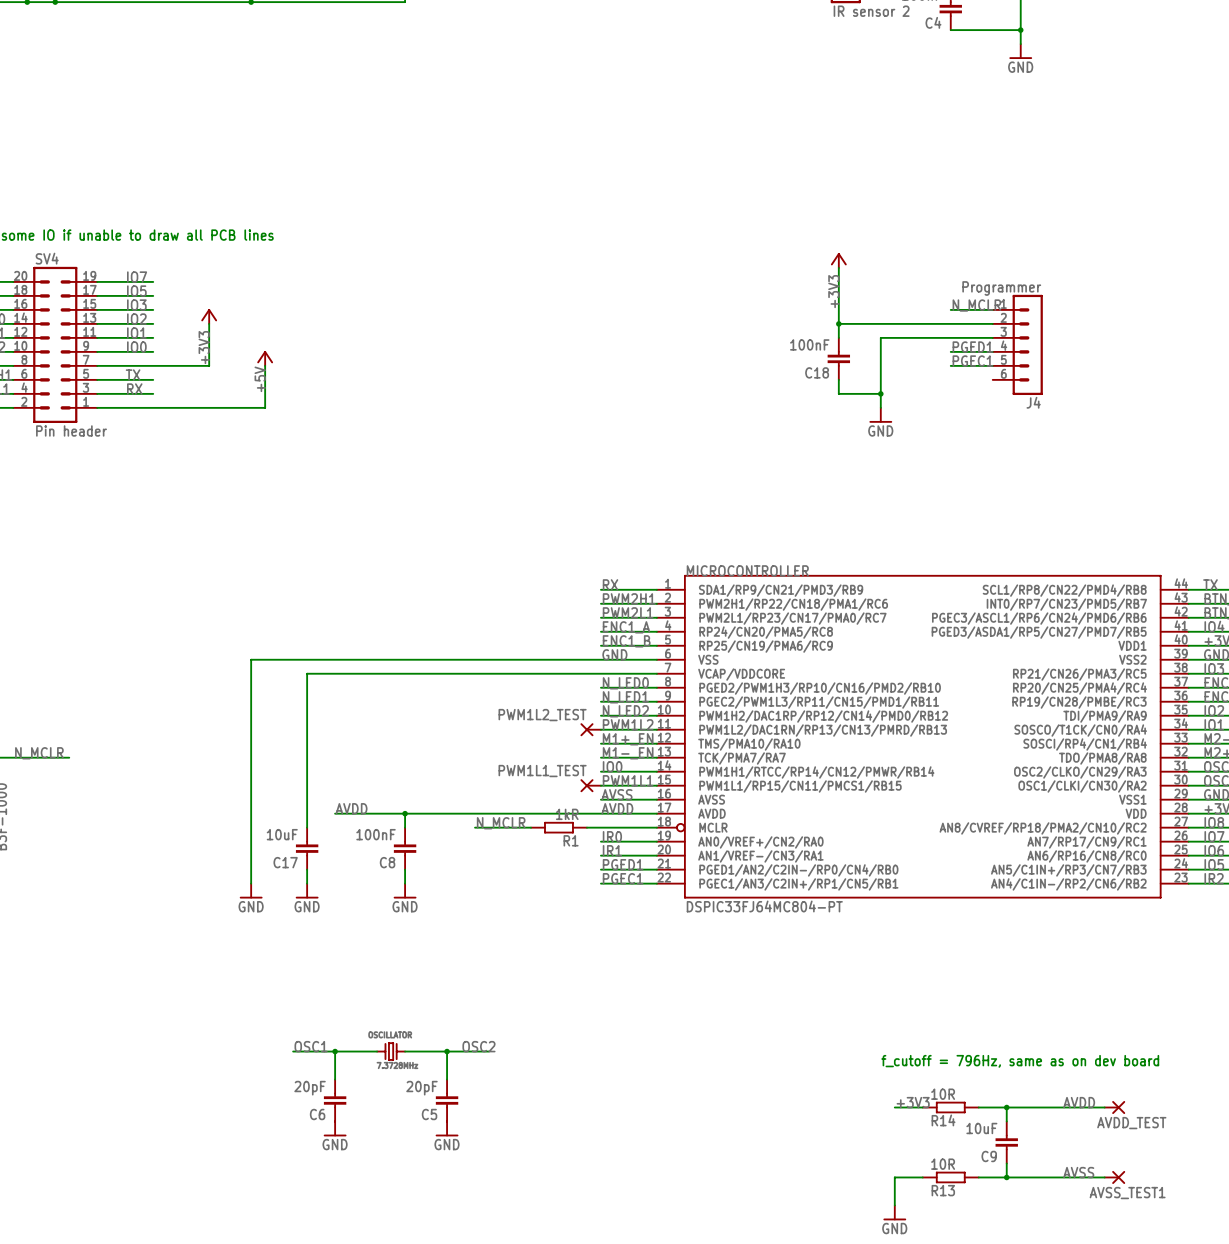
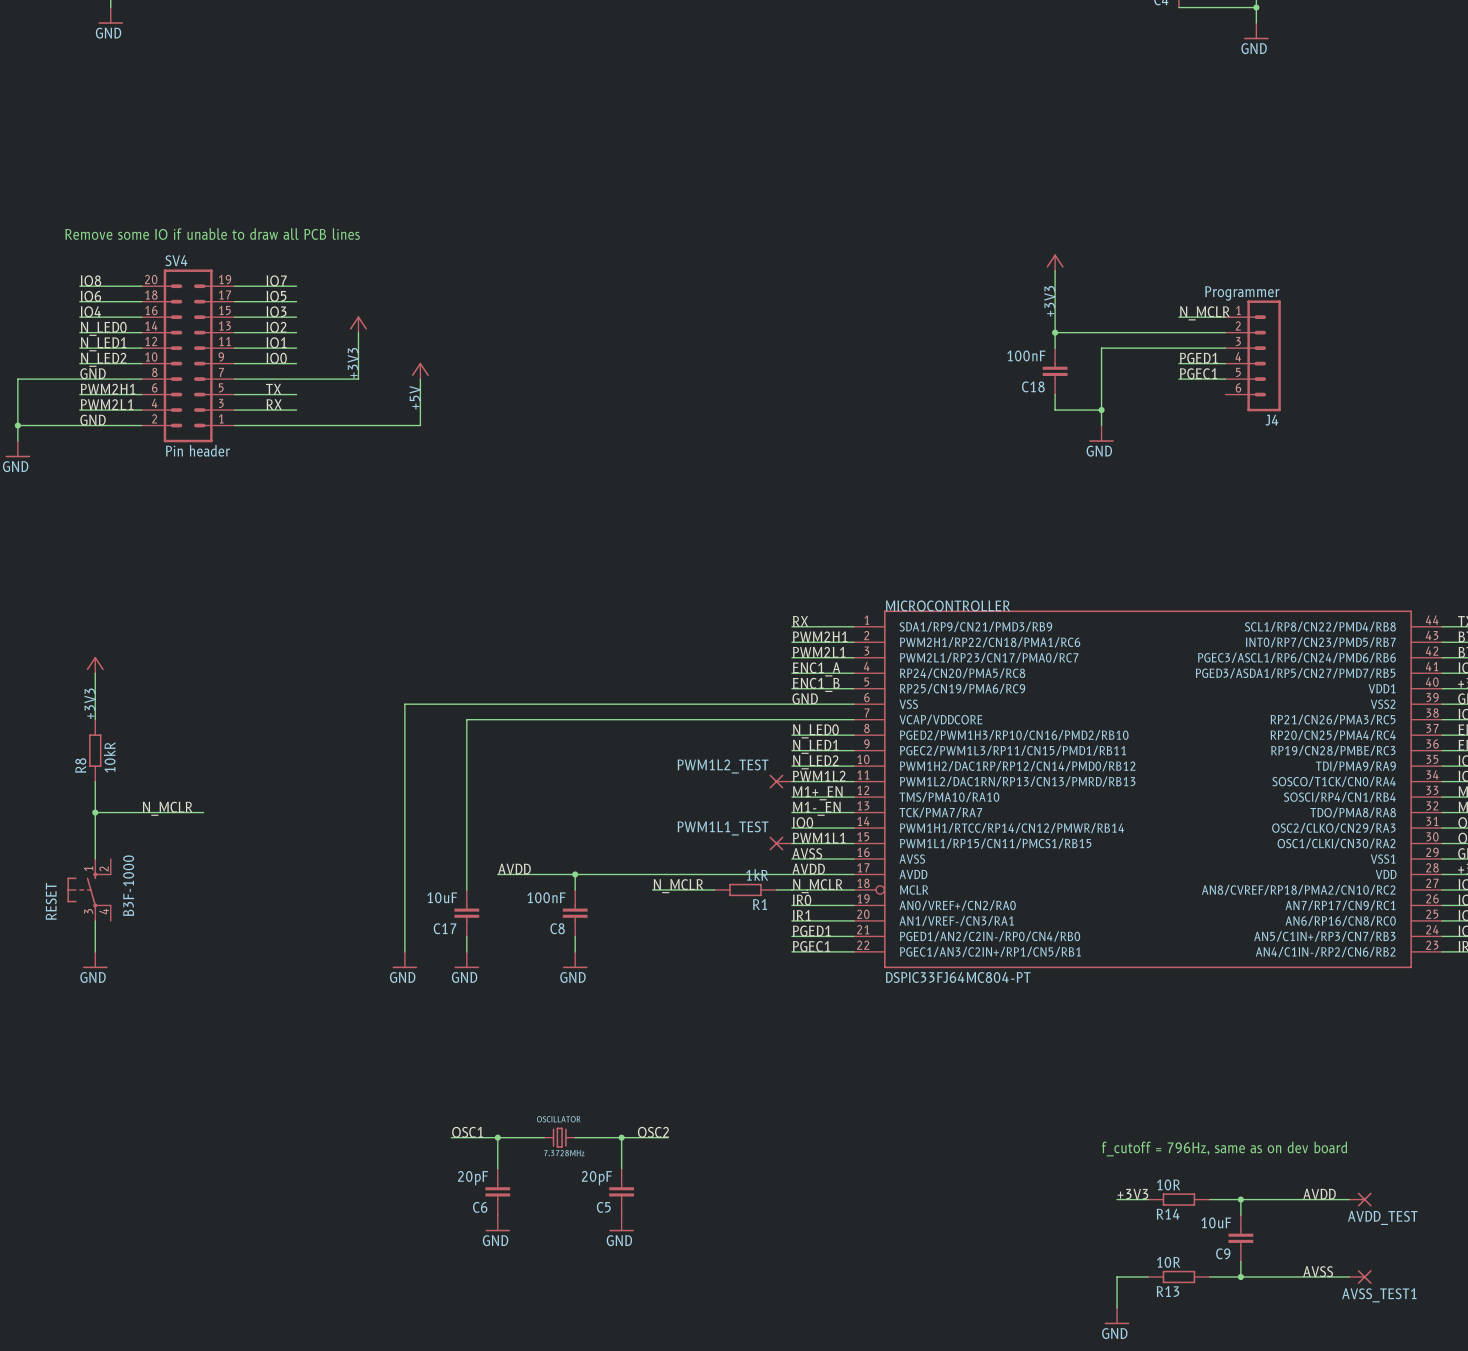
label: none -> N_MCLR (817, 886)

